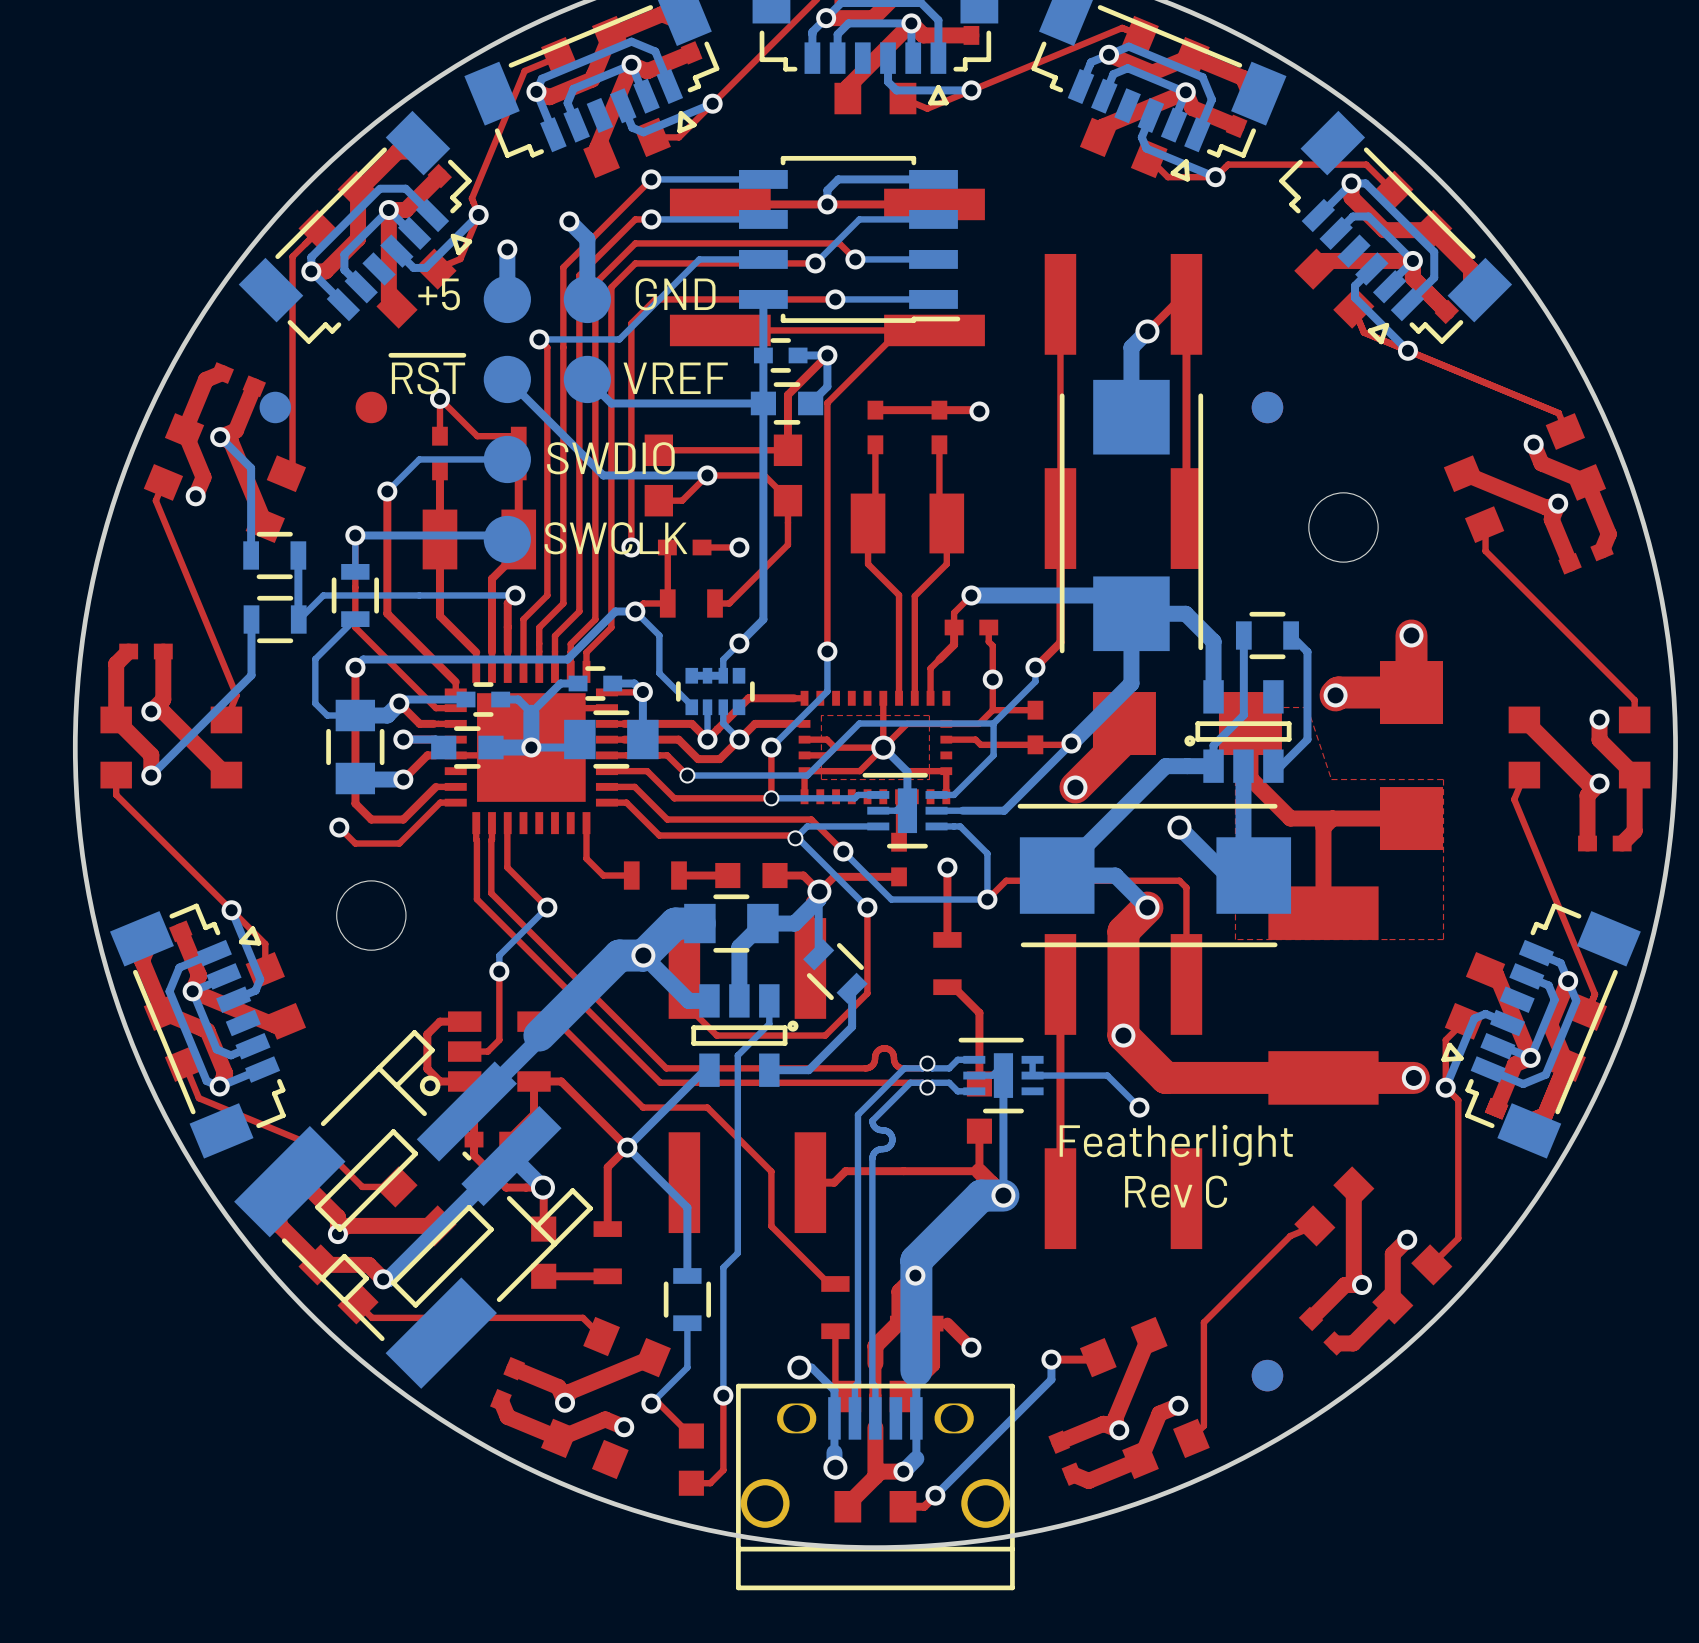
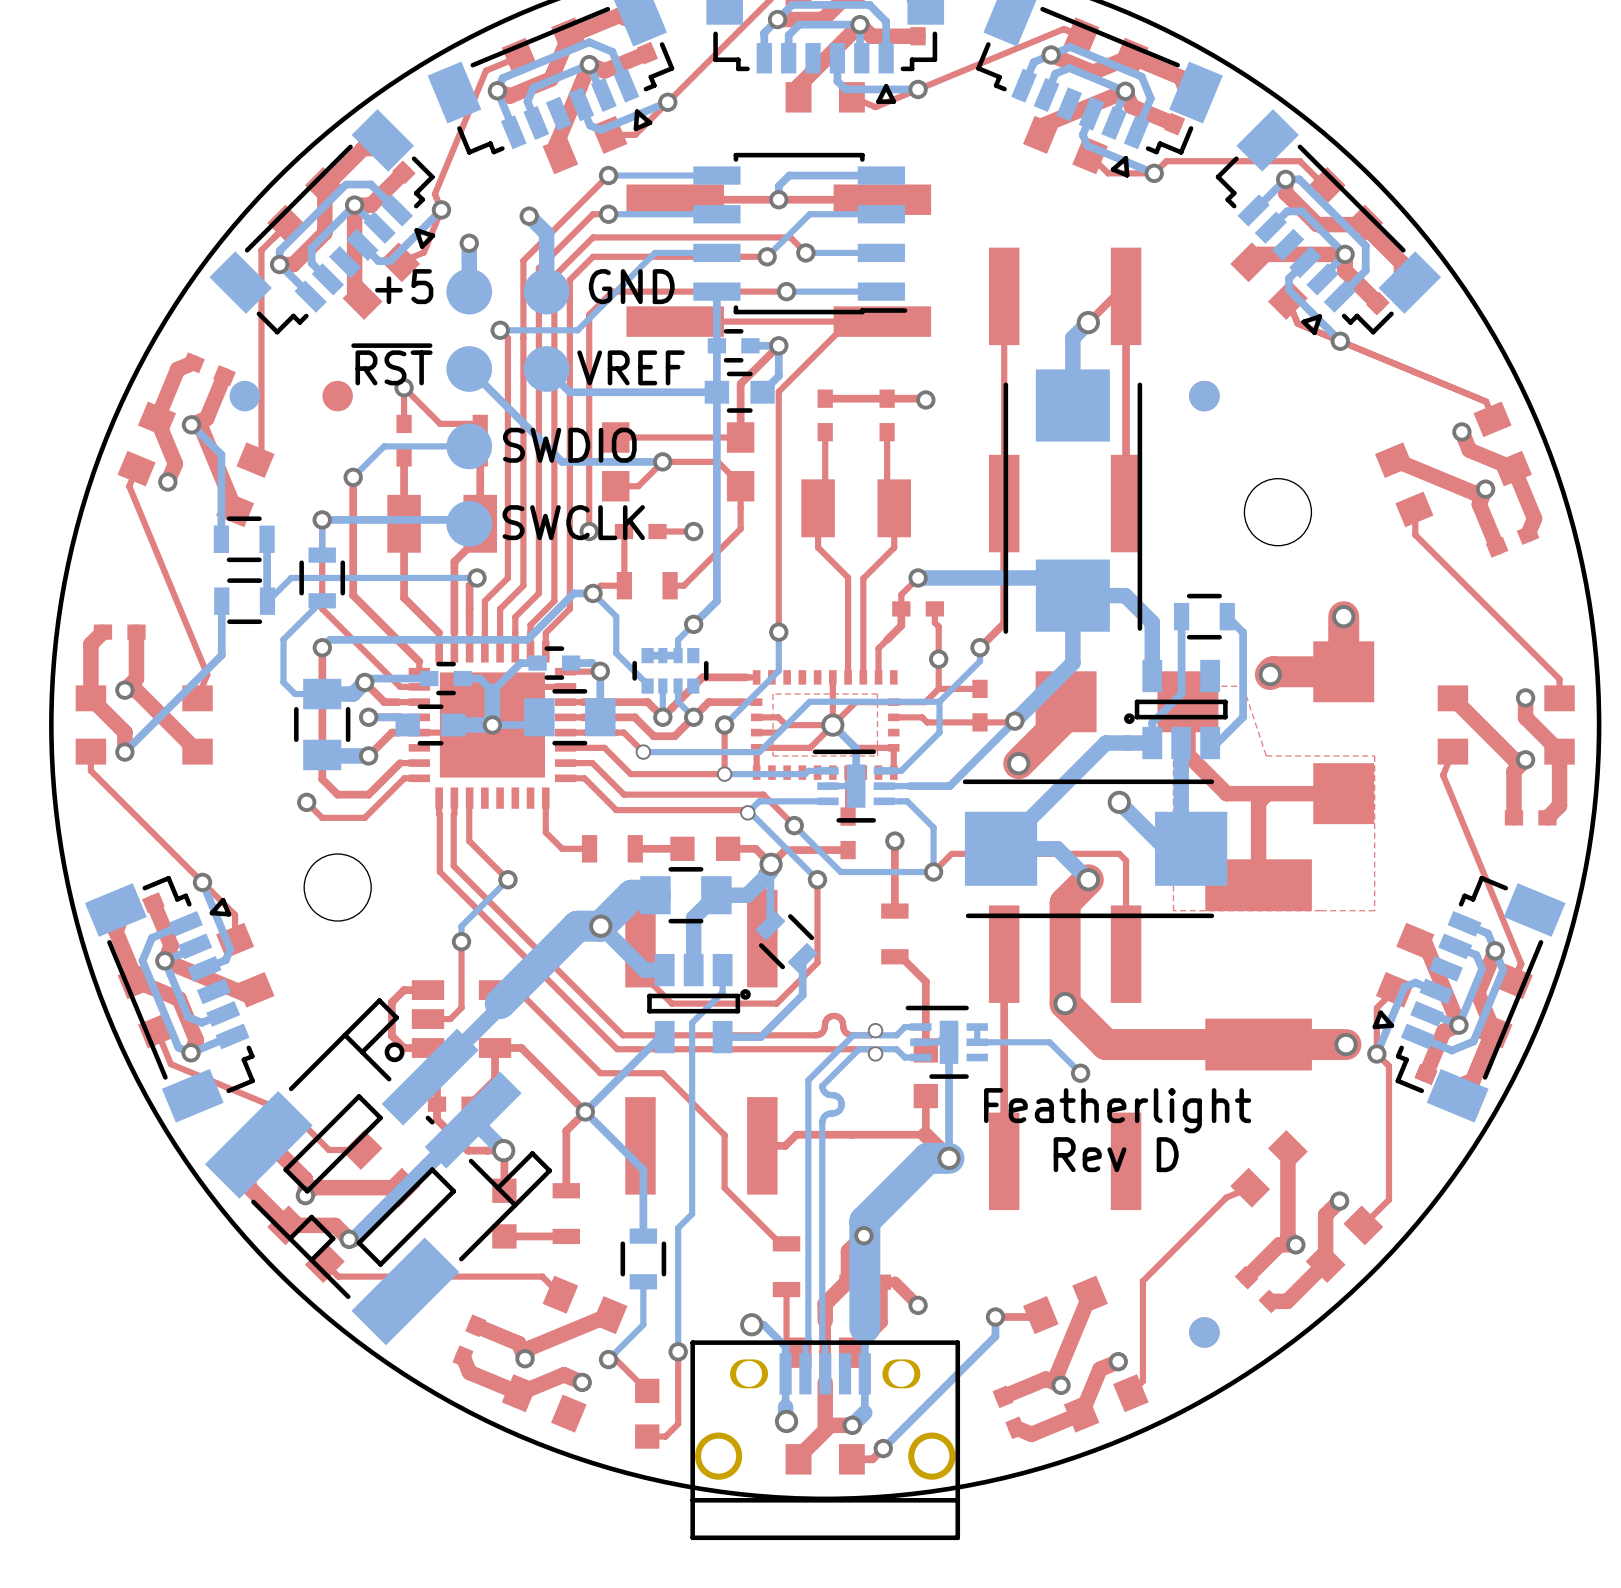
text: Rev C (1176, 1191) -> Rev D (1116, 1154)

